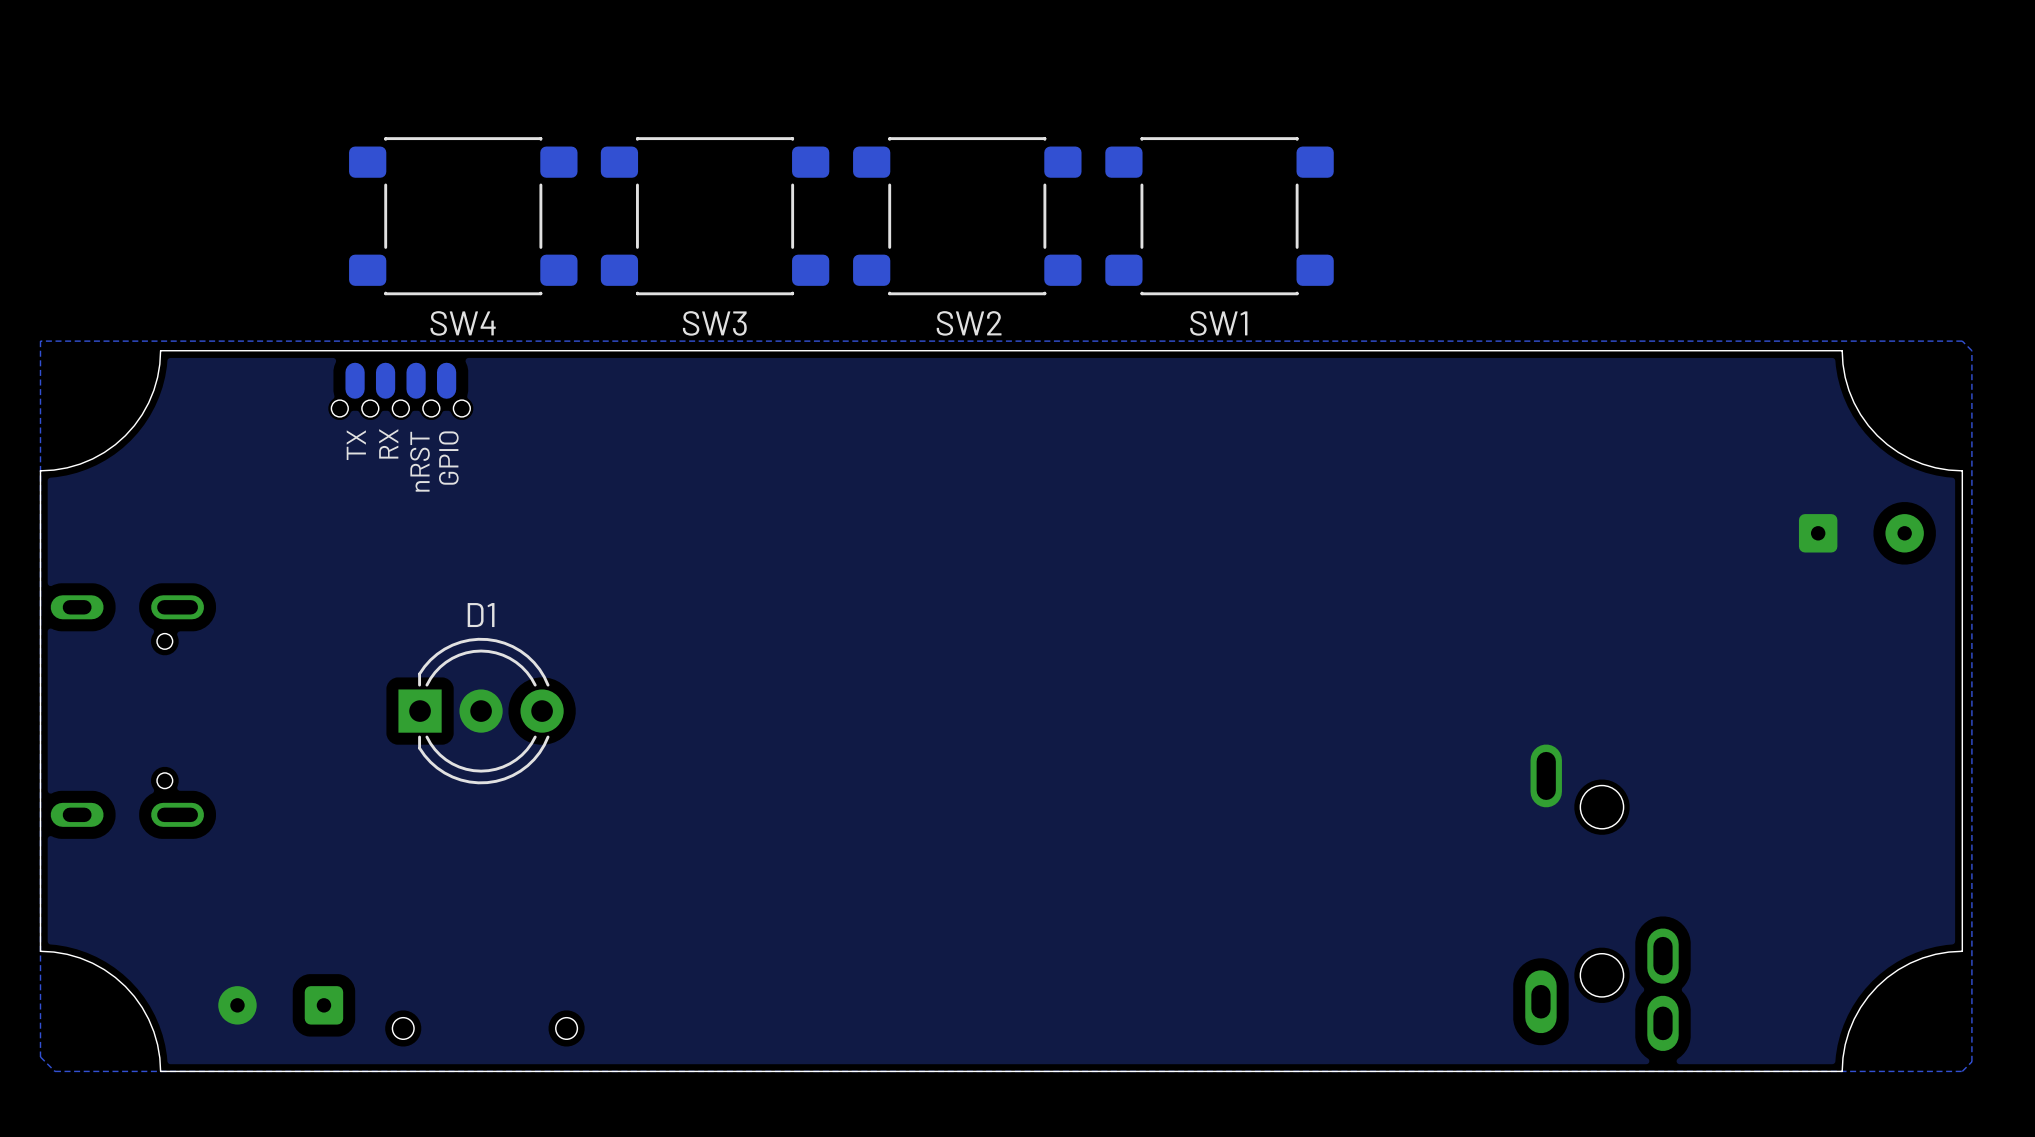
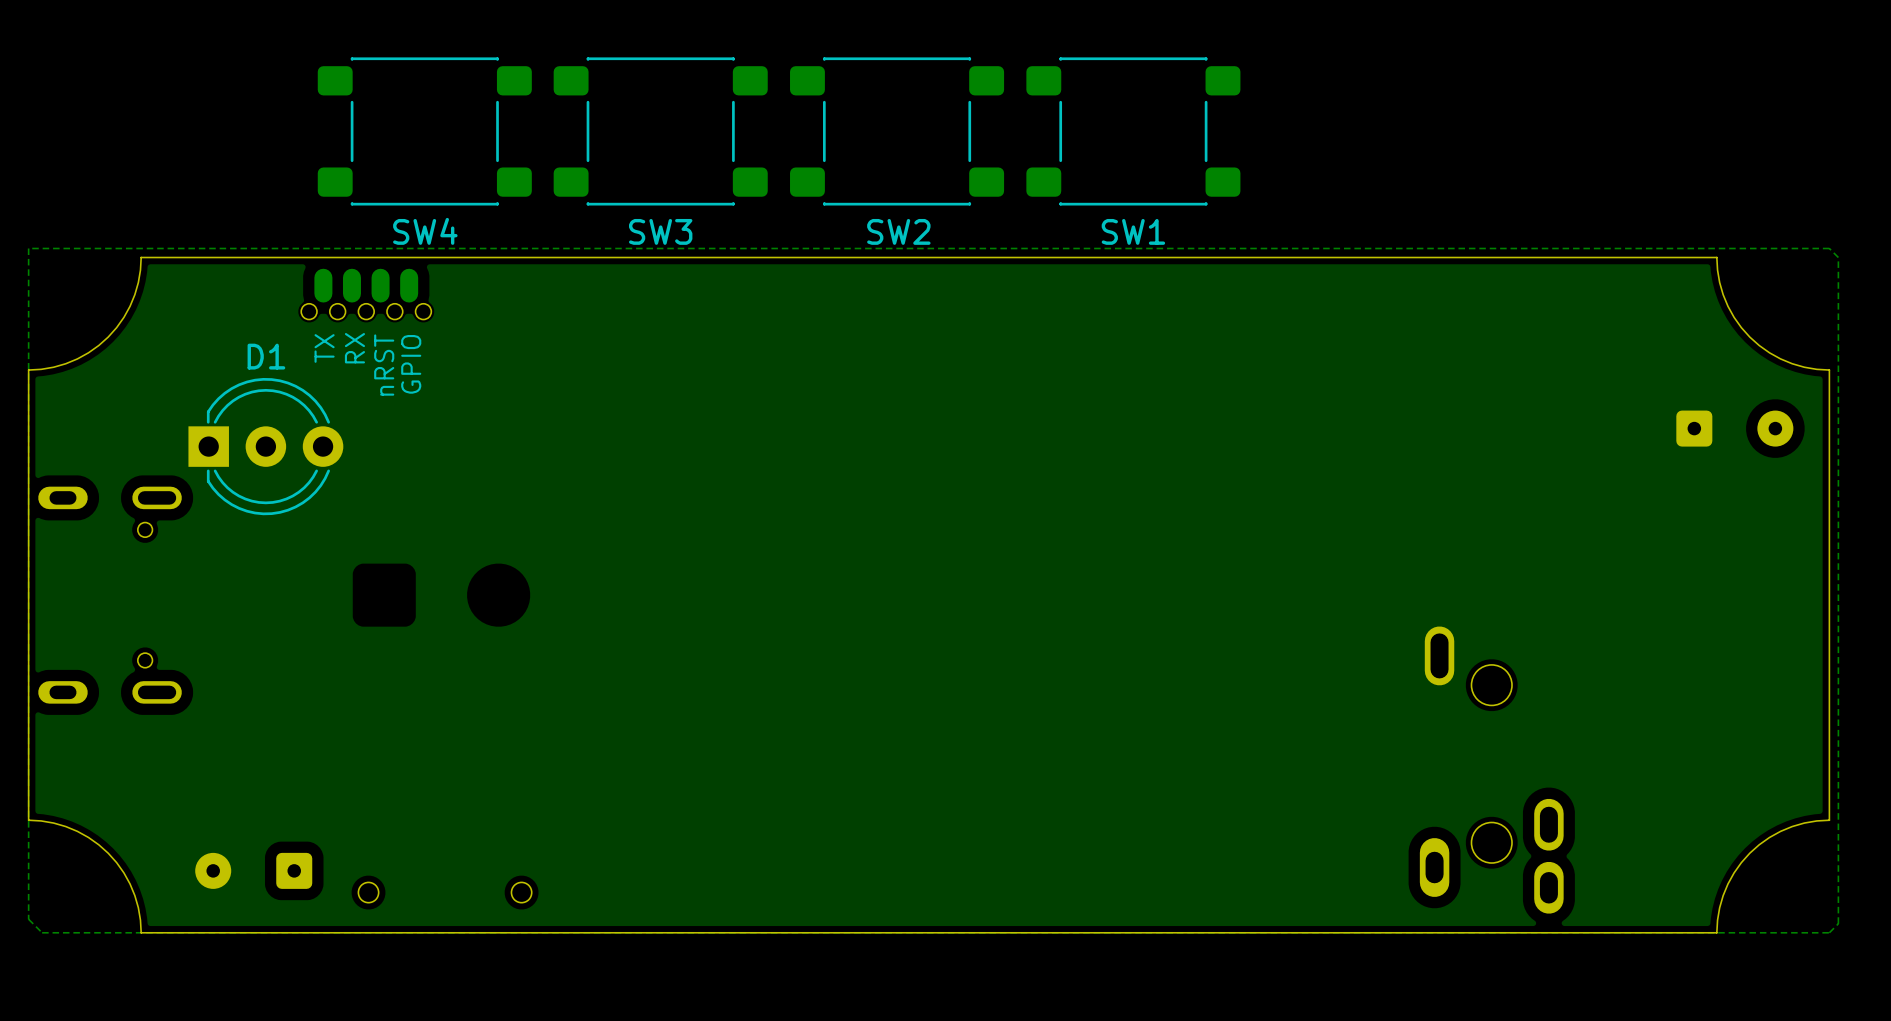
D1 position: (481, 711) -> (265, 446)

